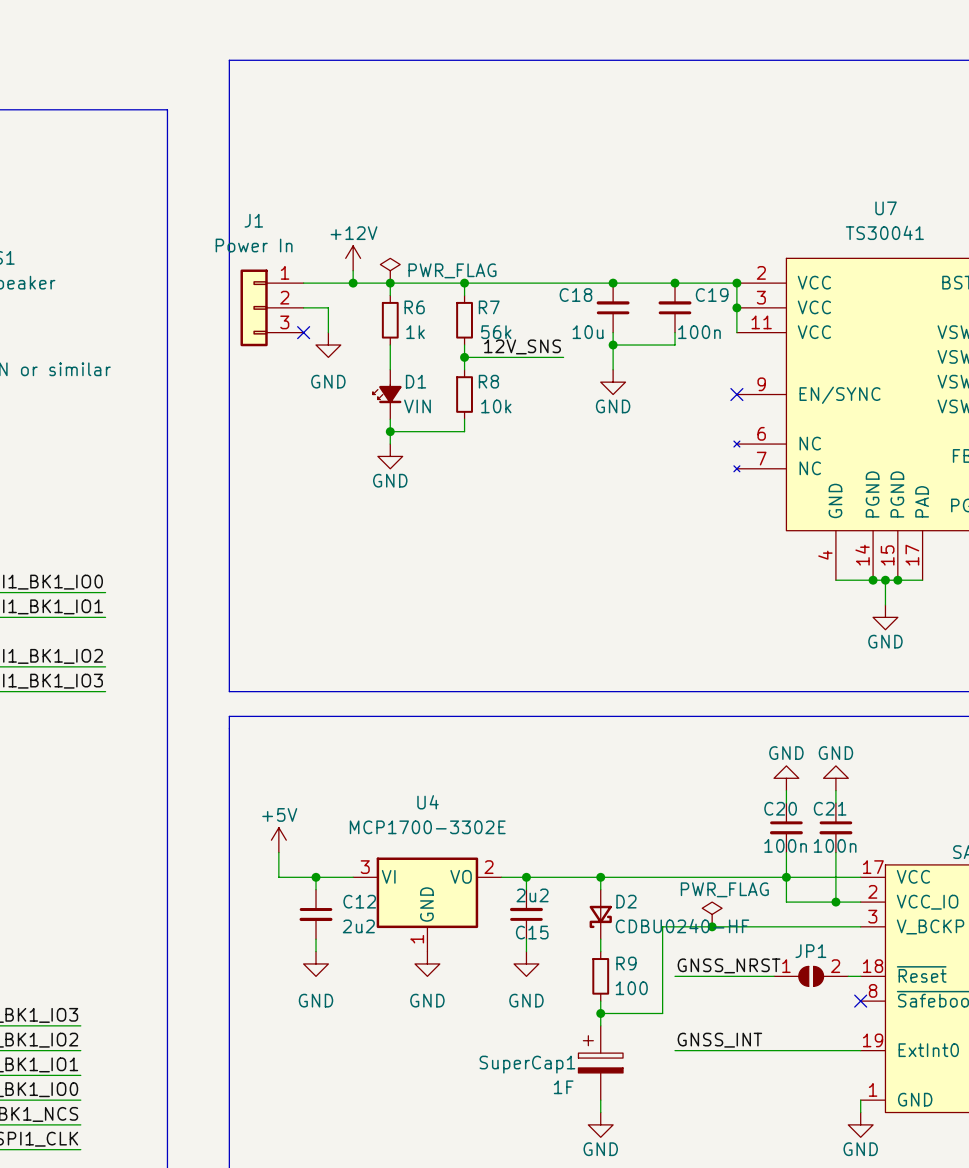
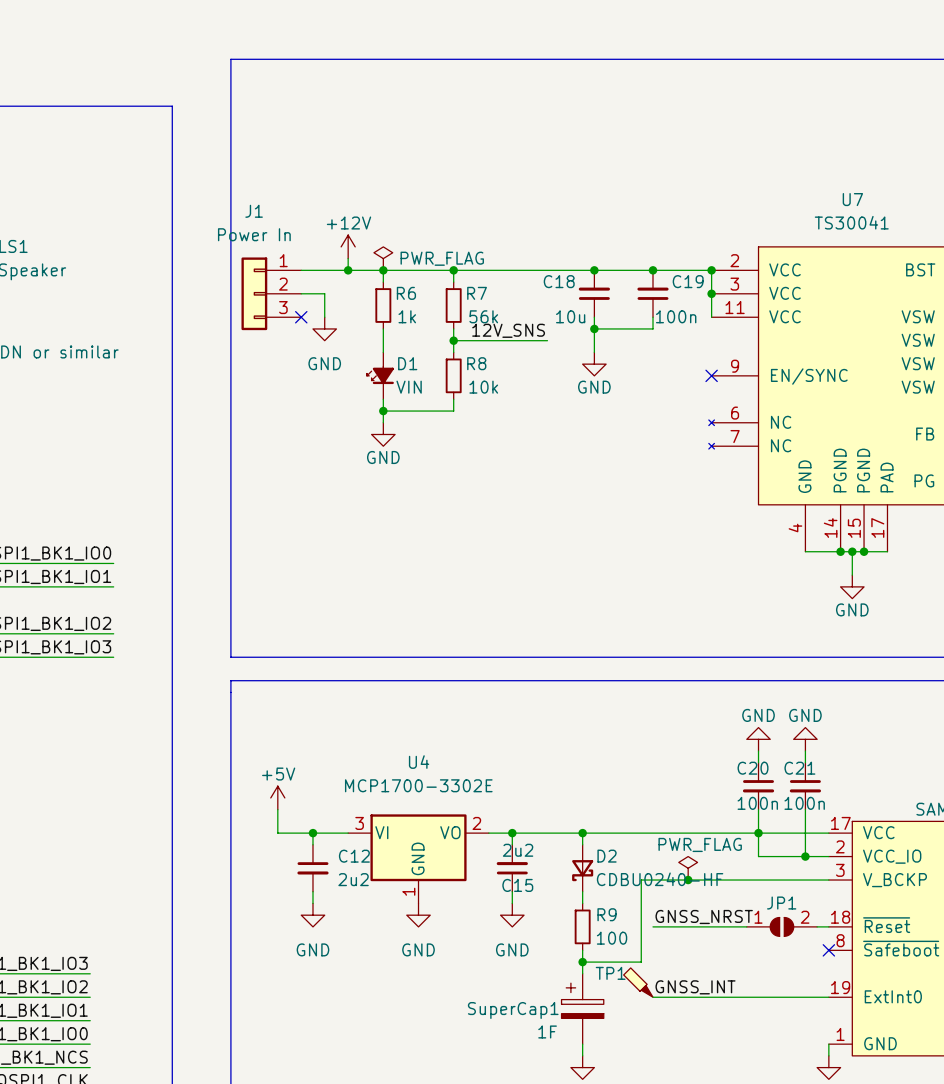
TP1: none -> (638, 982)

